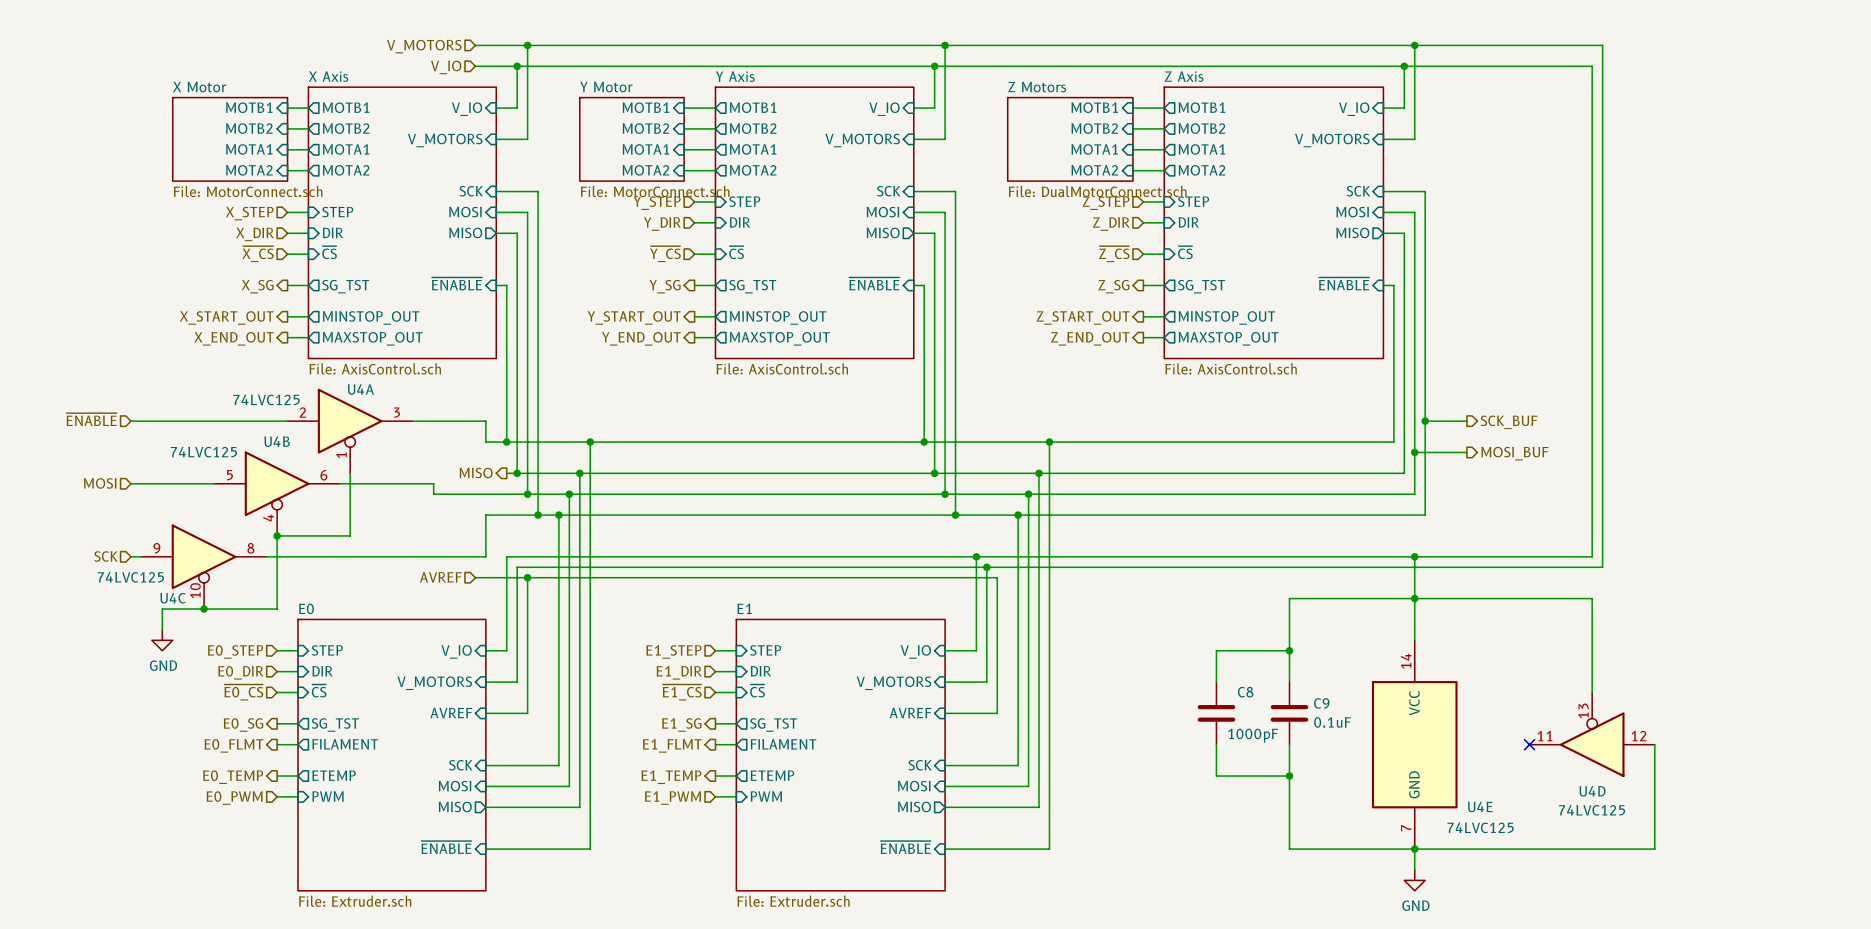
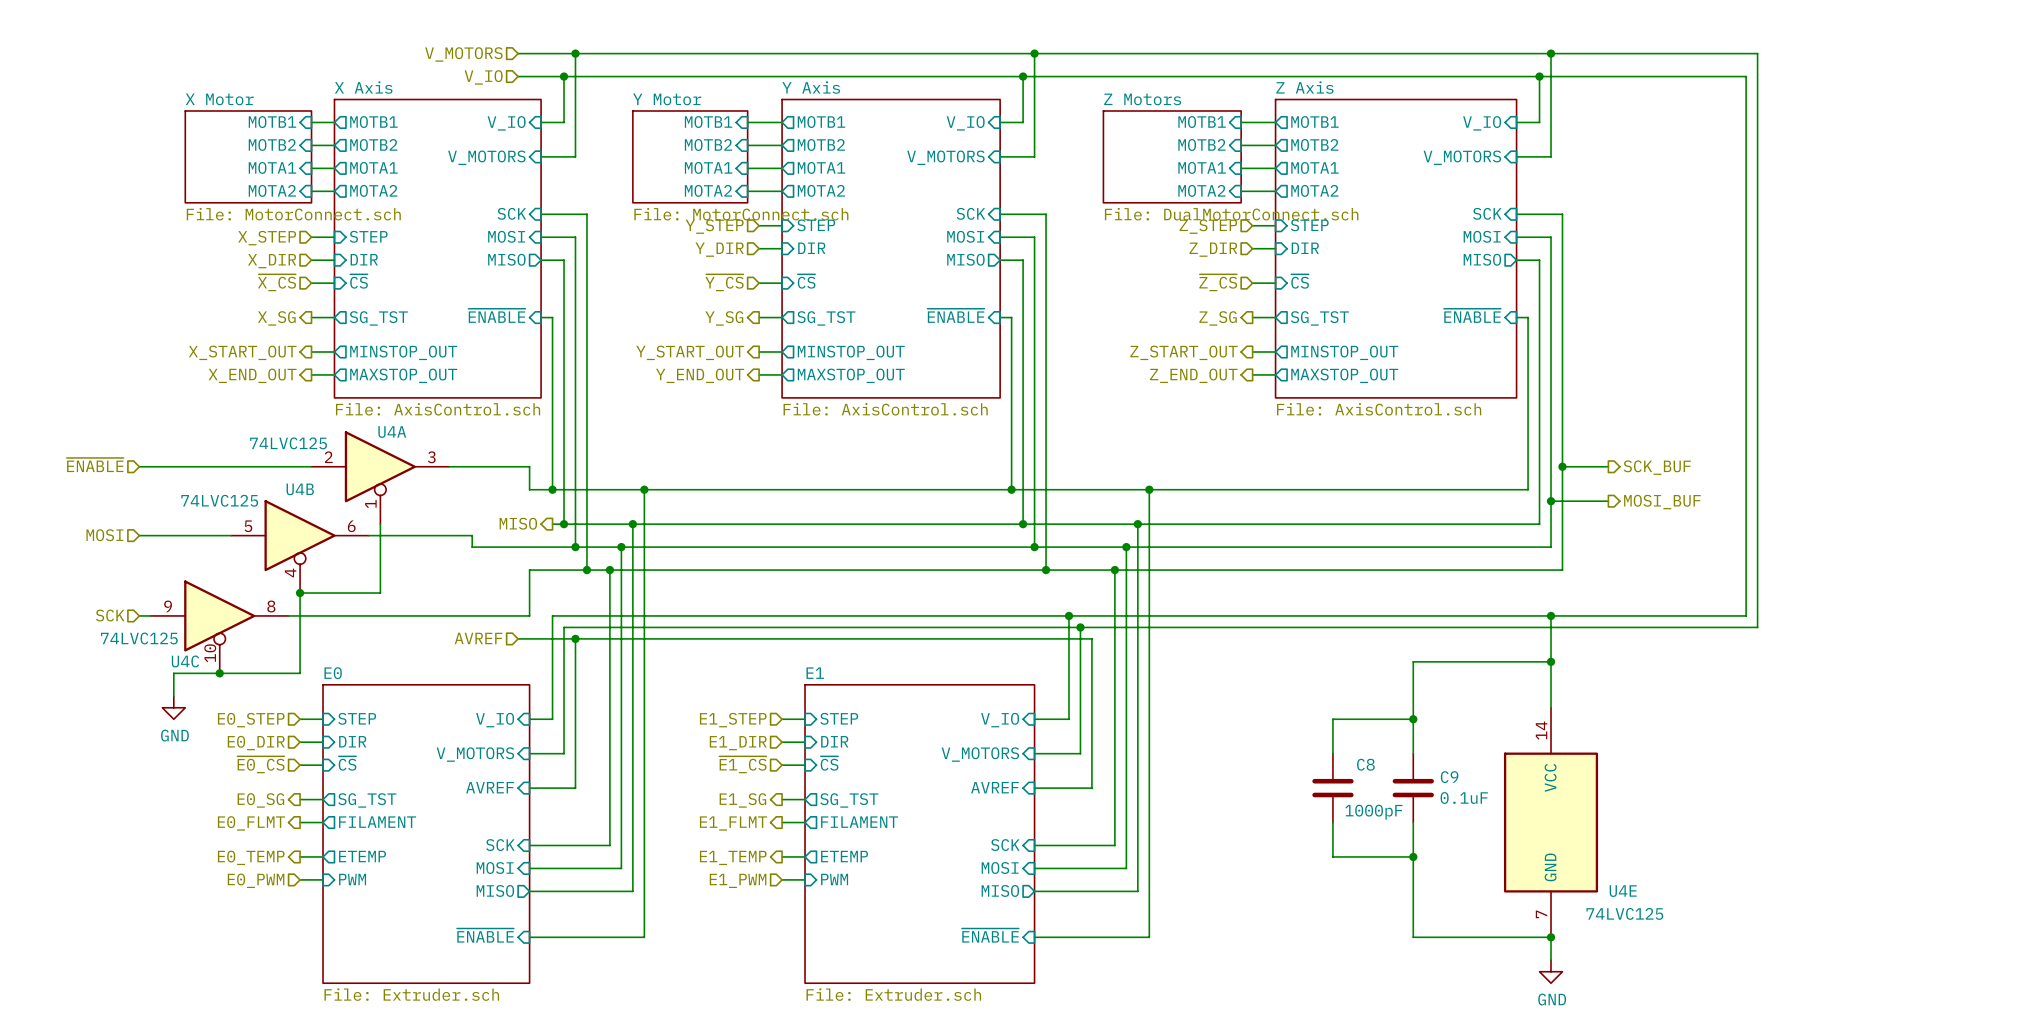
wire: (1414, 598) (1592, 598) (1592, 692) -> none
U4D: 74LVC125 (1592, 734) -> none
no-connect mark: (1529, 744) -> none
wire: (1654, 744) (1654, 849) (1414, 849) -> none

